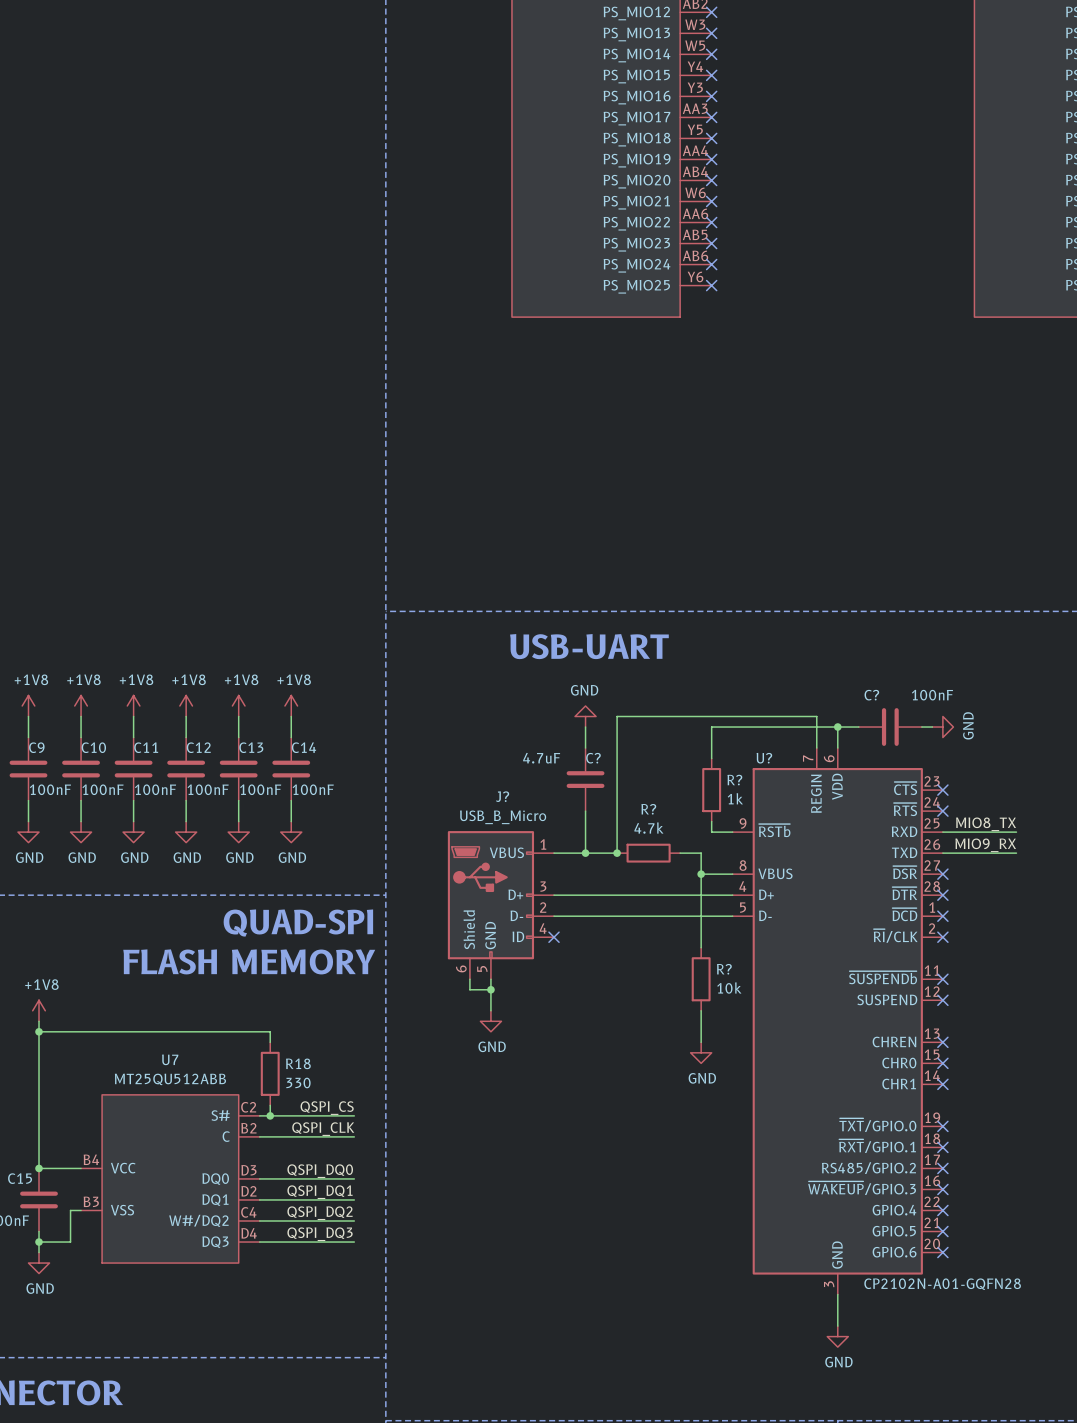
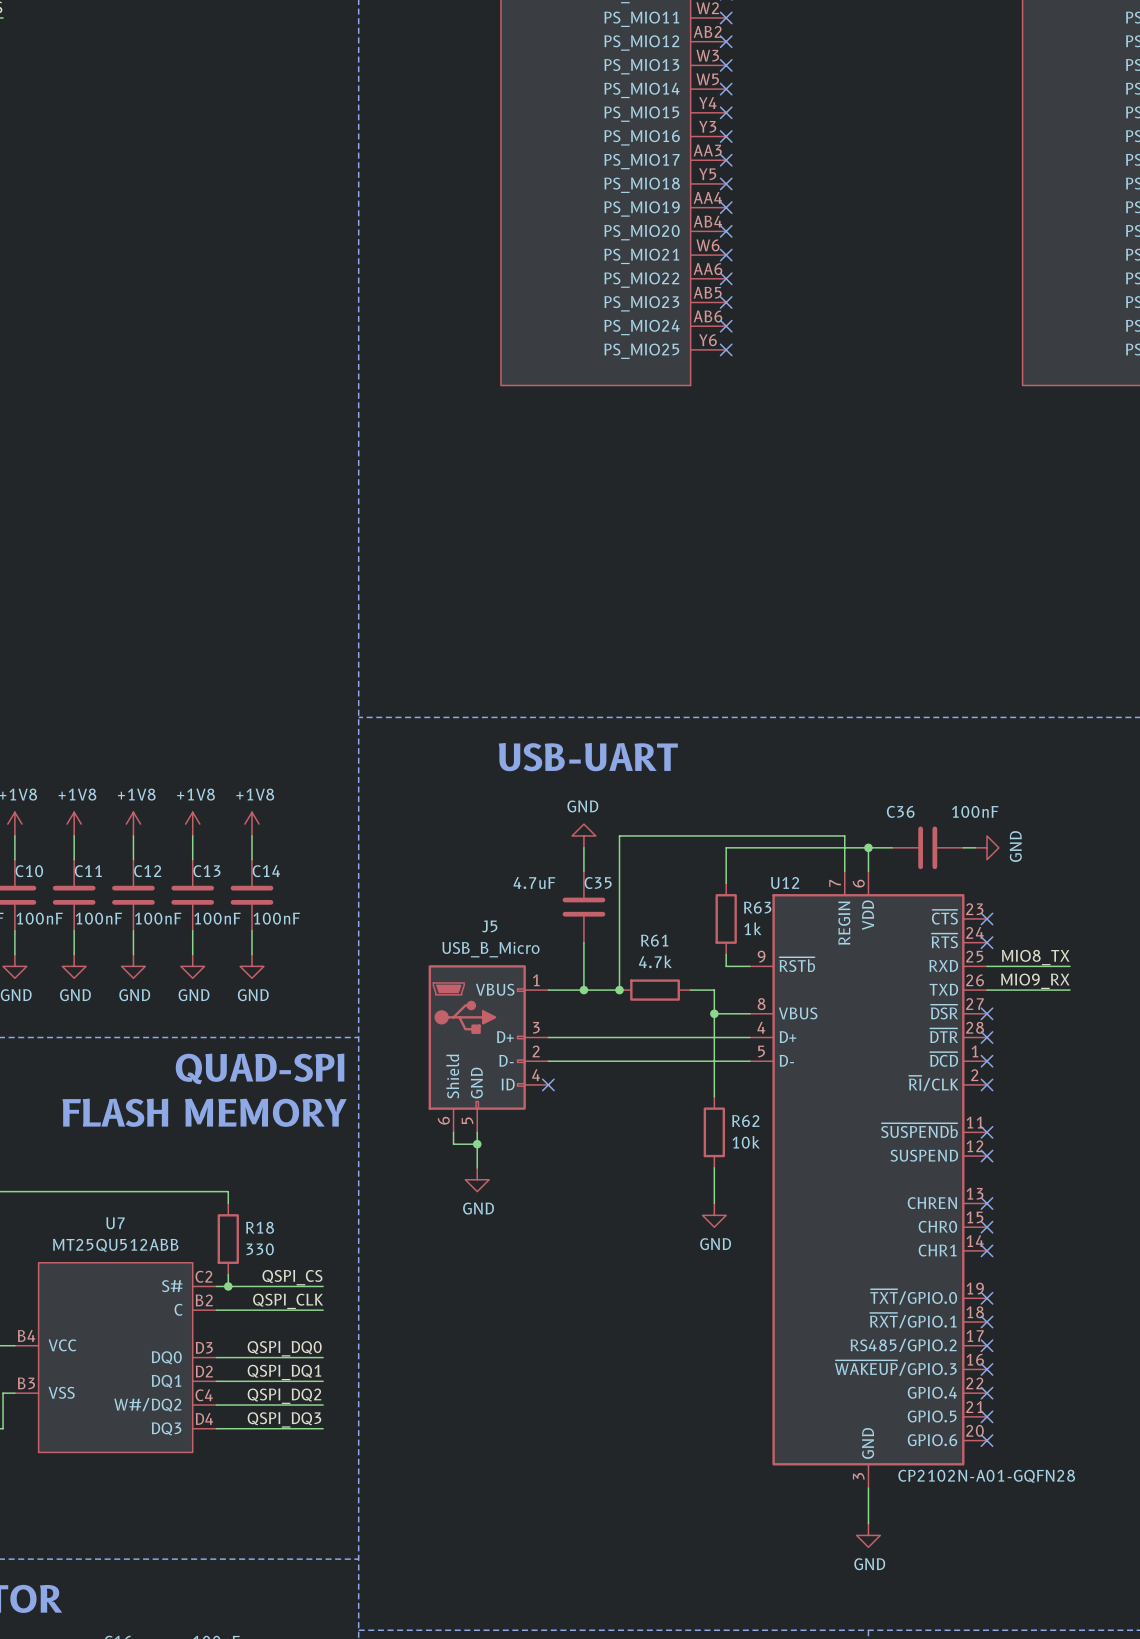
C? name: C? (871, 695) -> C36 (900, 811)
C? name: C? (593, 758) -> C35 (598, 883)
U? name: U? (764, 758) -> U12 (785, 883)
R? name: R? (734, 780) -> R63 (757, 907)
J? name: J? (502, 796) -> J5 (489, 926)
R? name: R? (648, 809) -> R61 (654, 940)
R? name: R? (724, 969) -> R62 (745, 1121)

